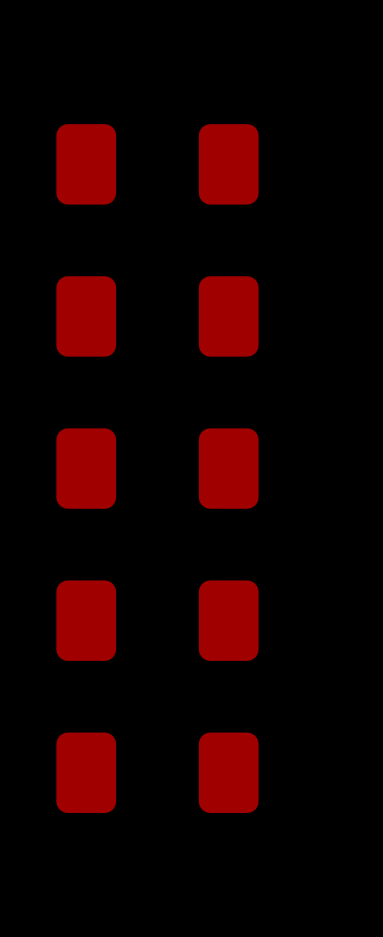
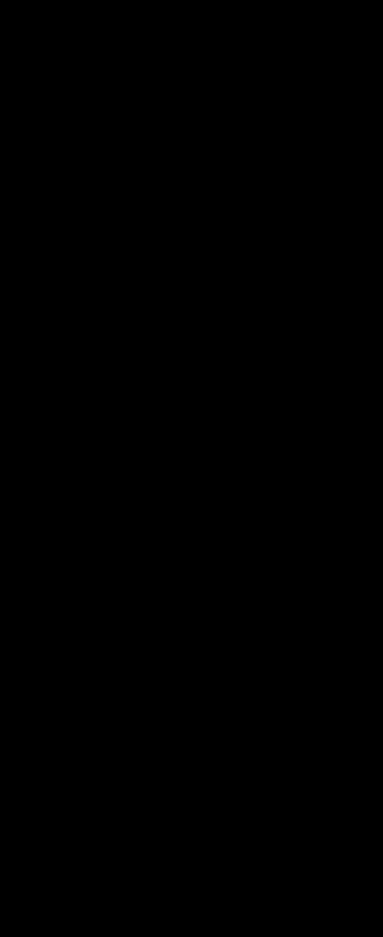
part: (157, 164) -> none
part: (157, 316) -> none
part: (157, 468) -> none
part: (157, 620) -> none
part: (157, 772) -> none

